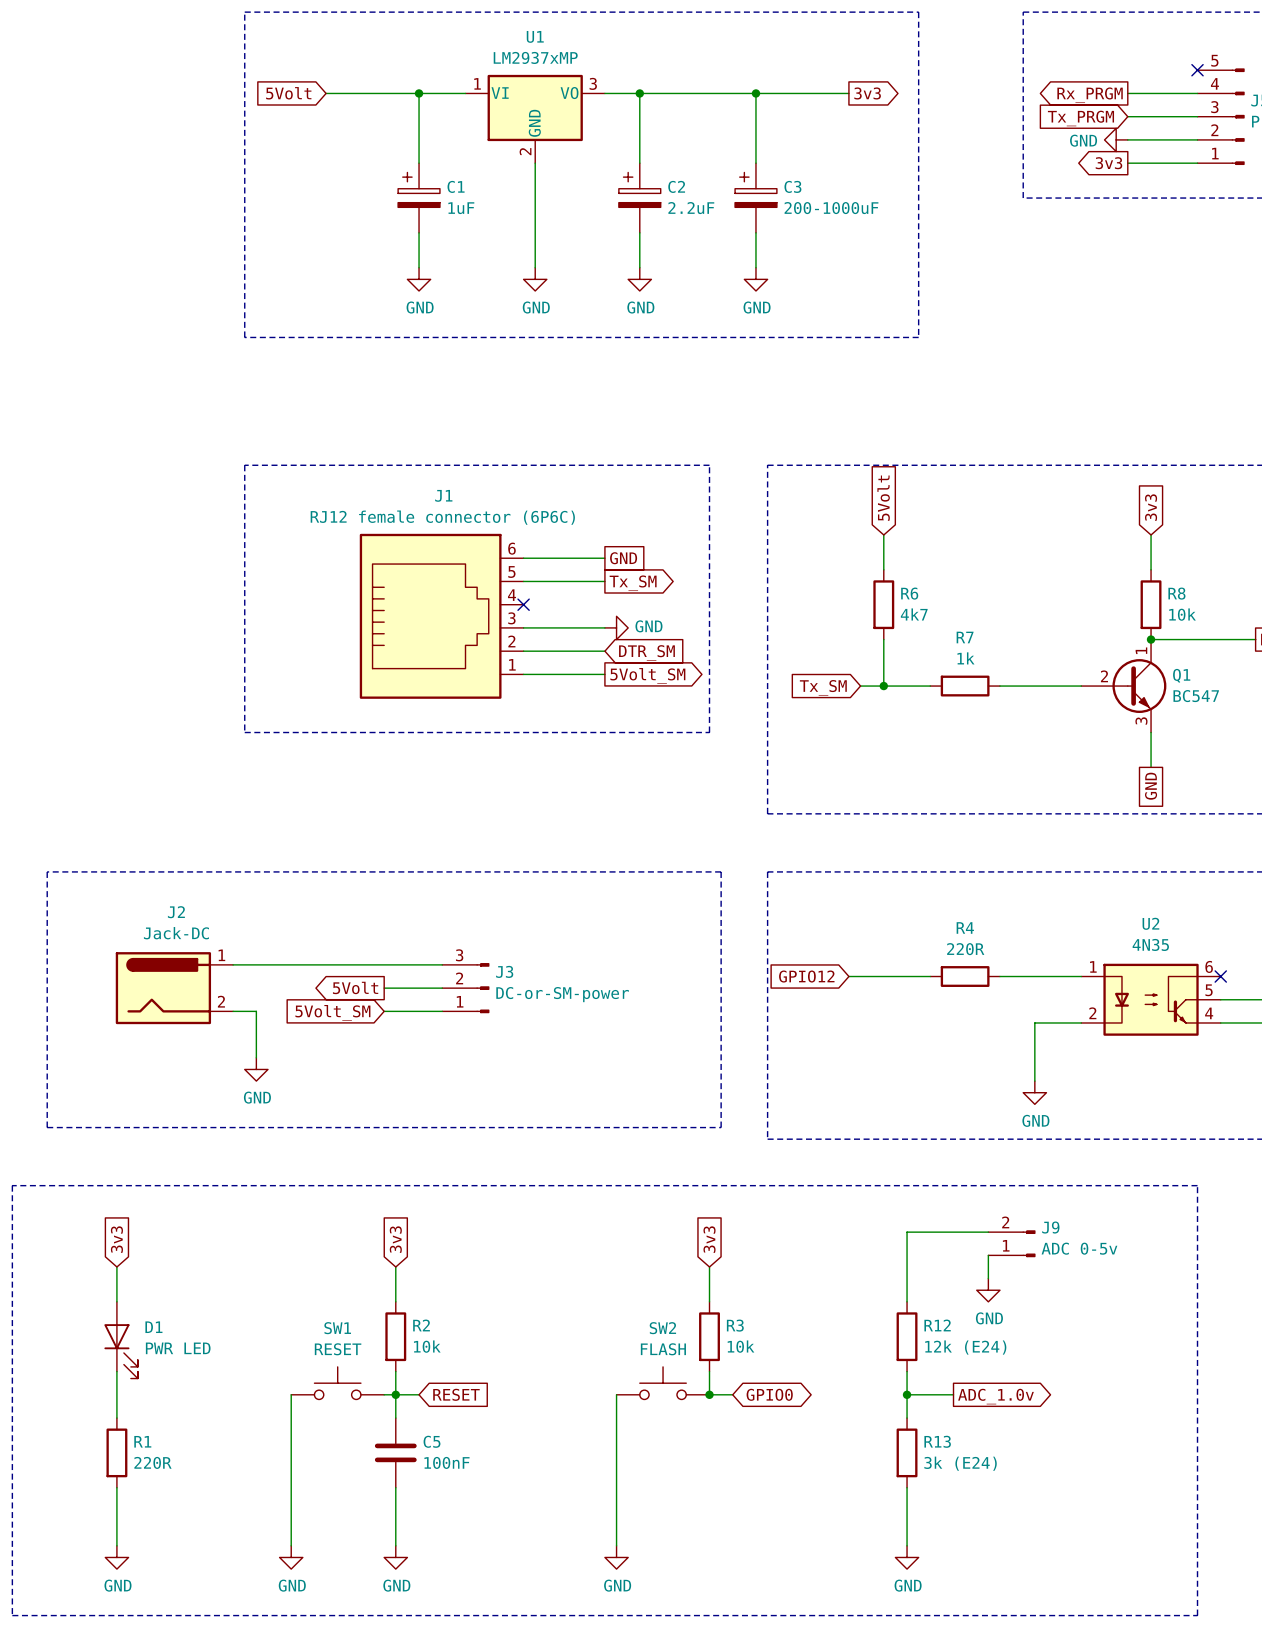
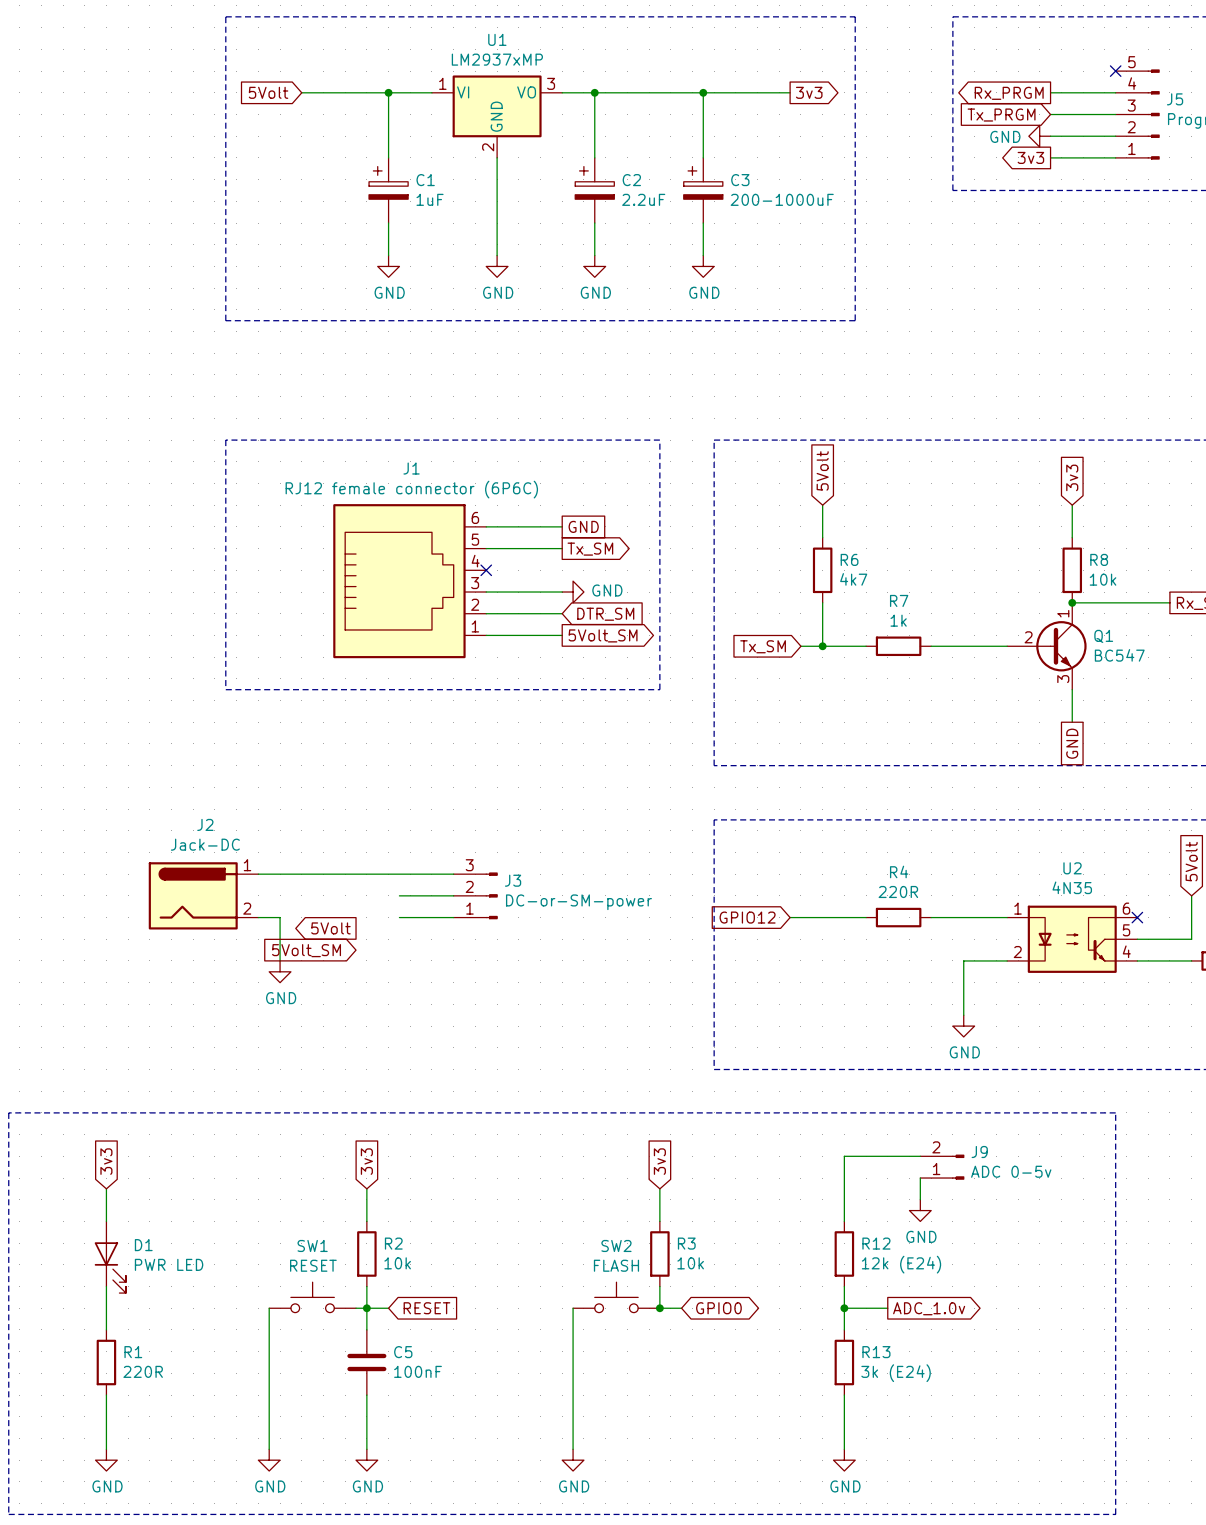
line: (47, 871) (721, 871) (721, 1127) (47, 1127) (47, 871) -> none
wire: (233, 964) (442, 964) -> (258, 874) (453, 874)
J2 position: (174, 988) -> (203, 895)
wire: (384, 988) (442, 988) -> (399, 895) (453, 895)
J3 position: (465, 988) -> (475, 895)
wire: (233, 1011) (256, 1011) (256, 1057) -> (258, 917) (280, 917) (280, 960)
wire: (384, 1011) (442, 1011) -> (399, 917) (453, 917)
power symbol position: GND (256, 1069) -> GND (280, 971)

